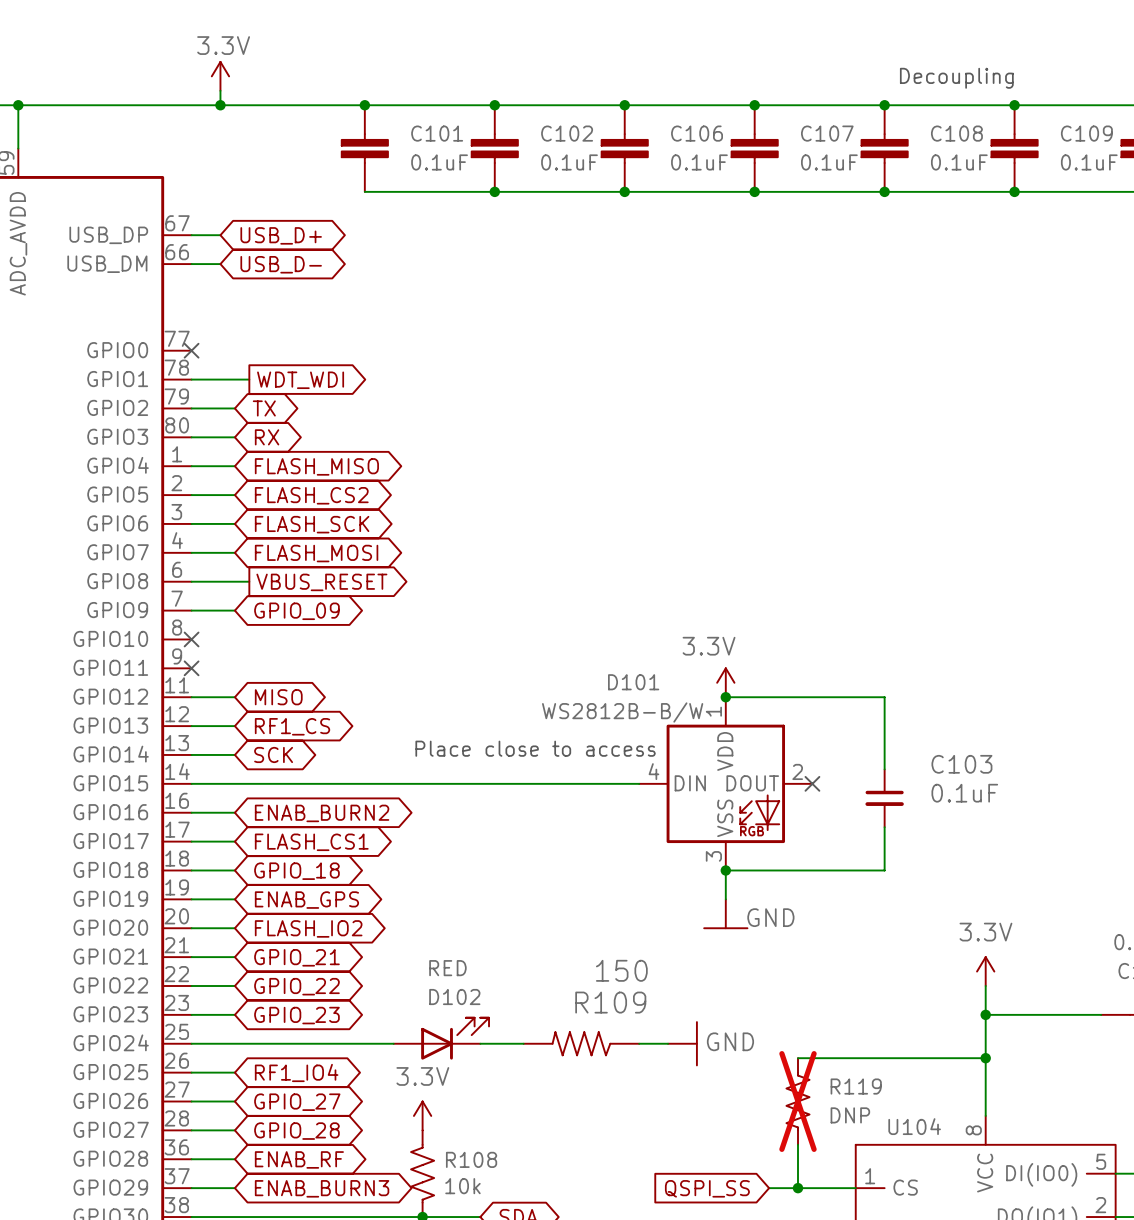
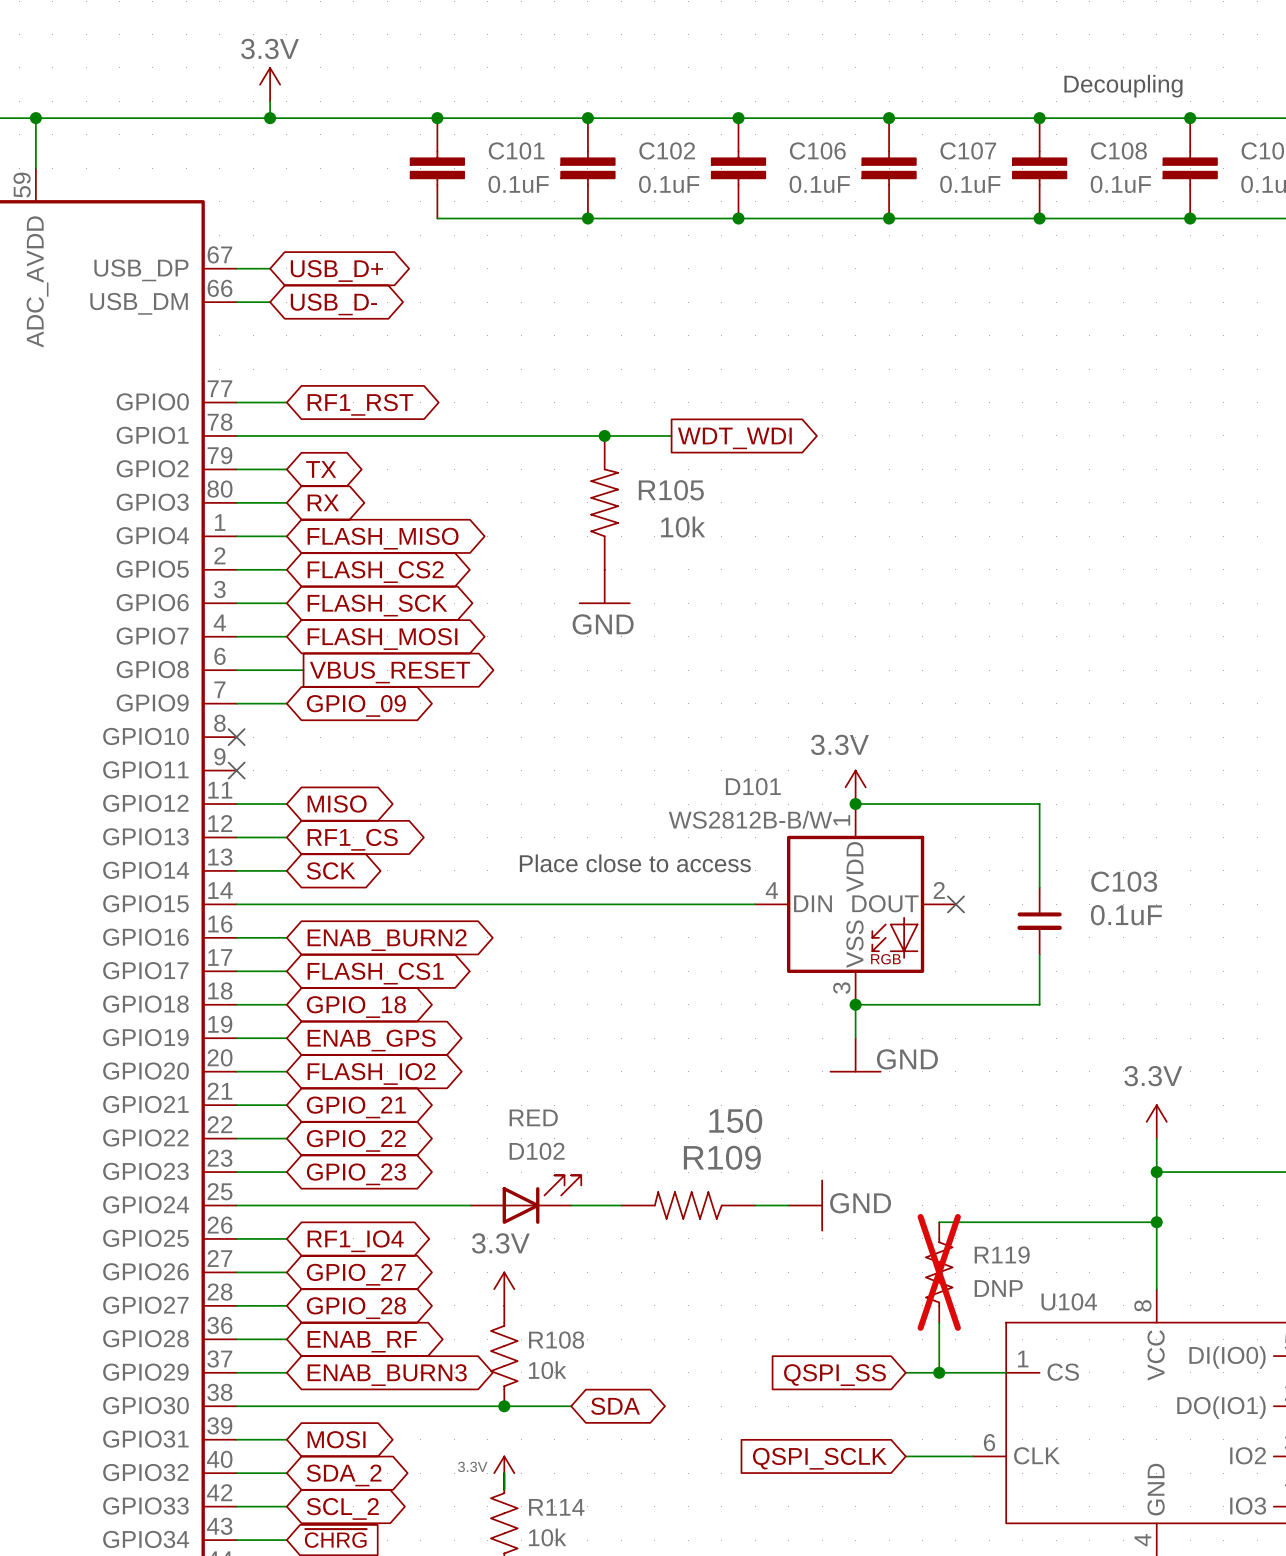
wire: none -> (236, 402) (286, 402)
no-connect mark: (191, 350) -> none
global label: none -> RF1_RST (360, 404)
wire: none -> (303, 435) (671, 435)
junction: none -> (604, 435)
global label: WDT_WDI (300, 380) -> none
global label: none -> WDT_WDI (734, 438)
R105: none -> 10k (604, 502)
power symbol: none -> GND (604, 586)

